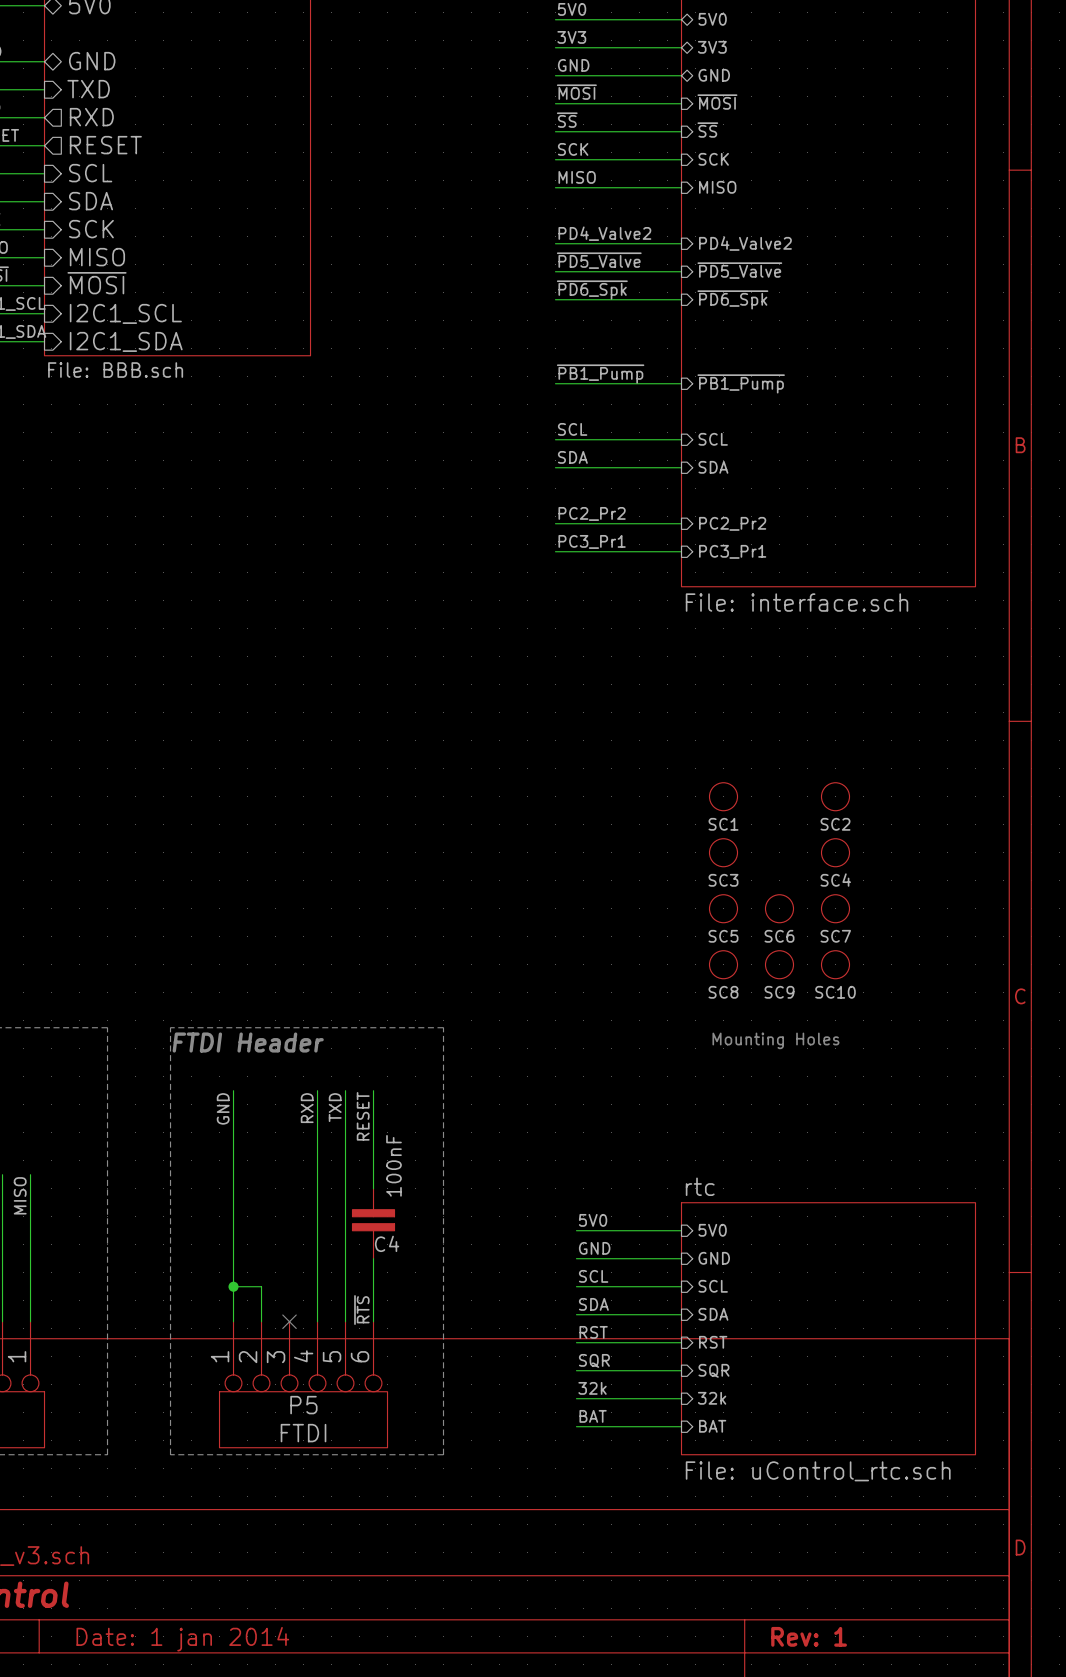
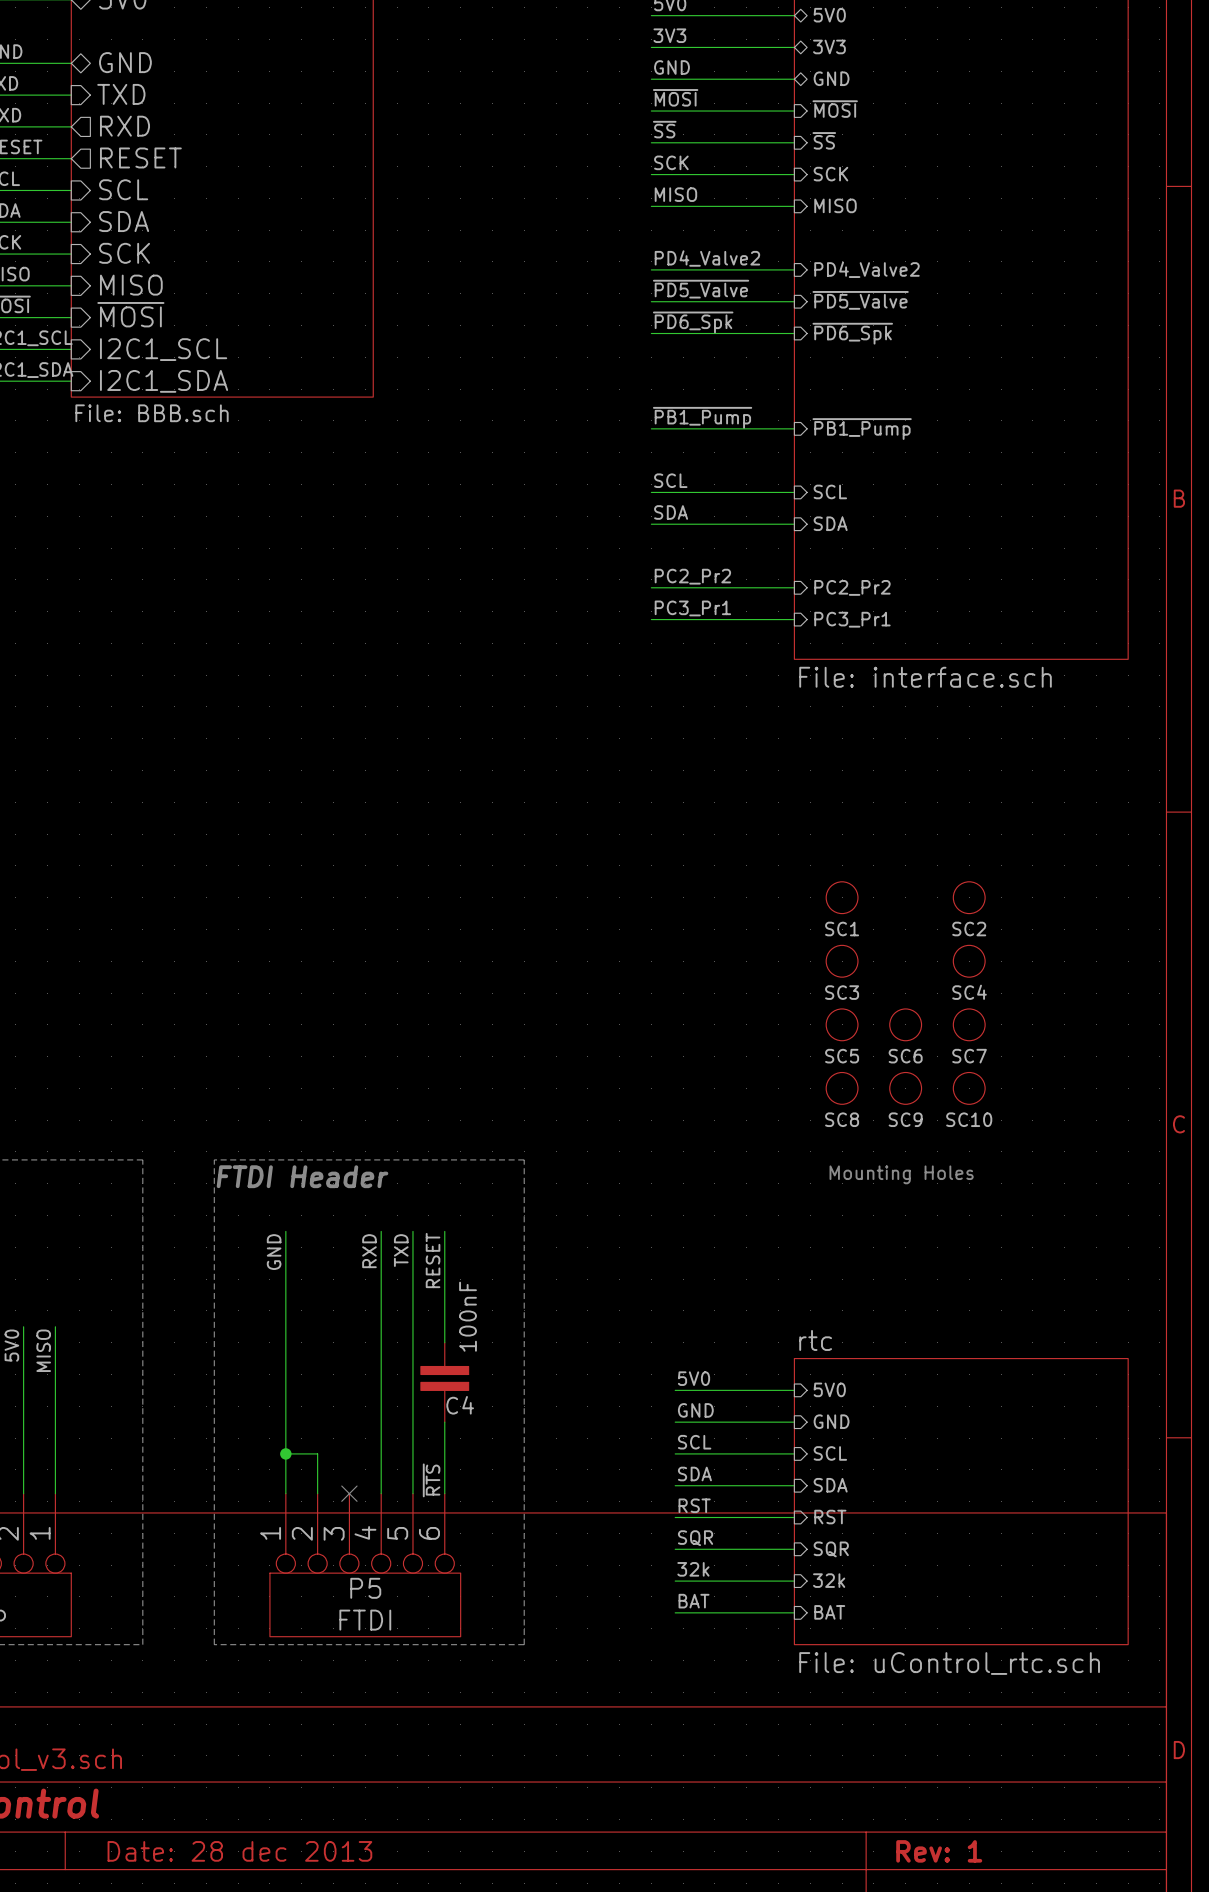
title block: Date: 1 jan 2014 (182, 1639) -> Date: 28 dec 2013 (239, 1851)

